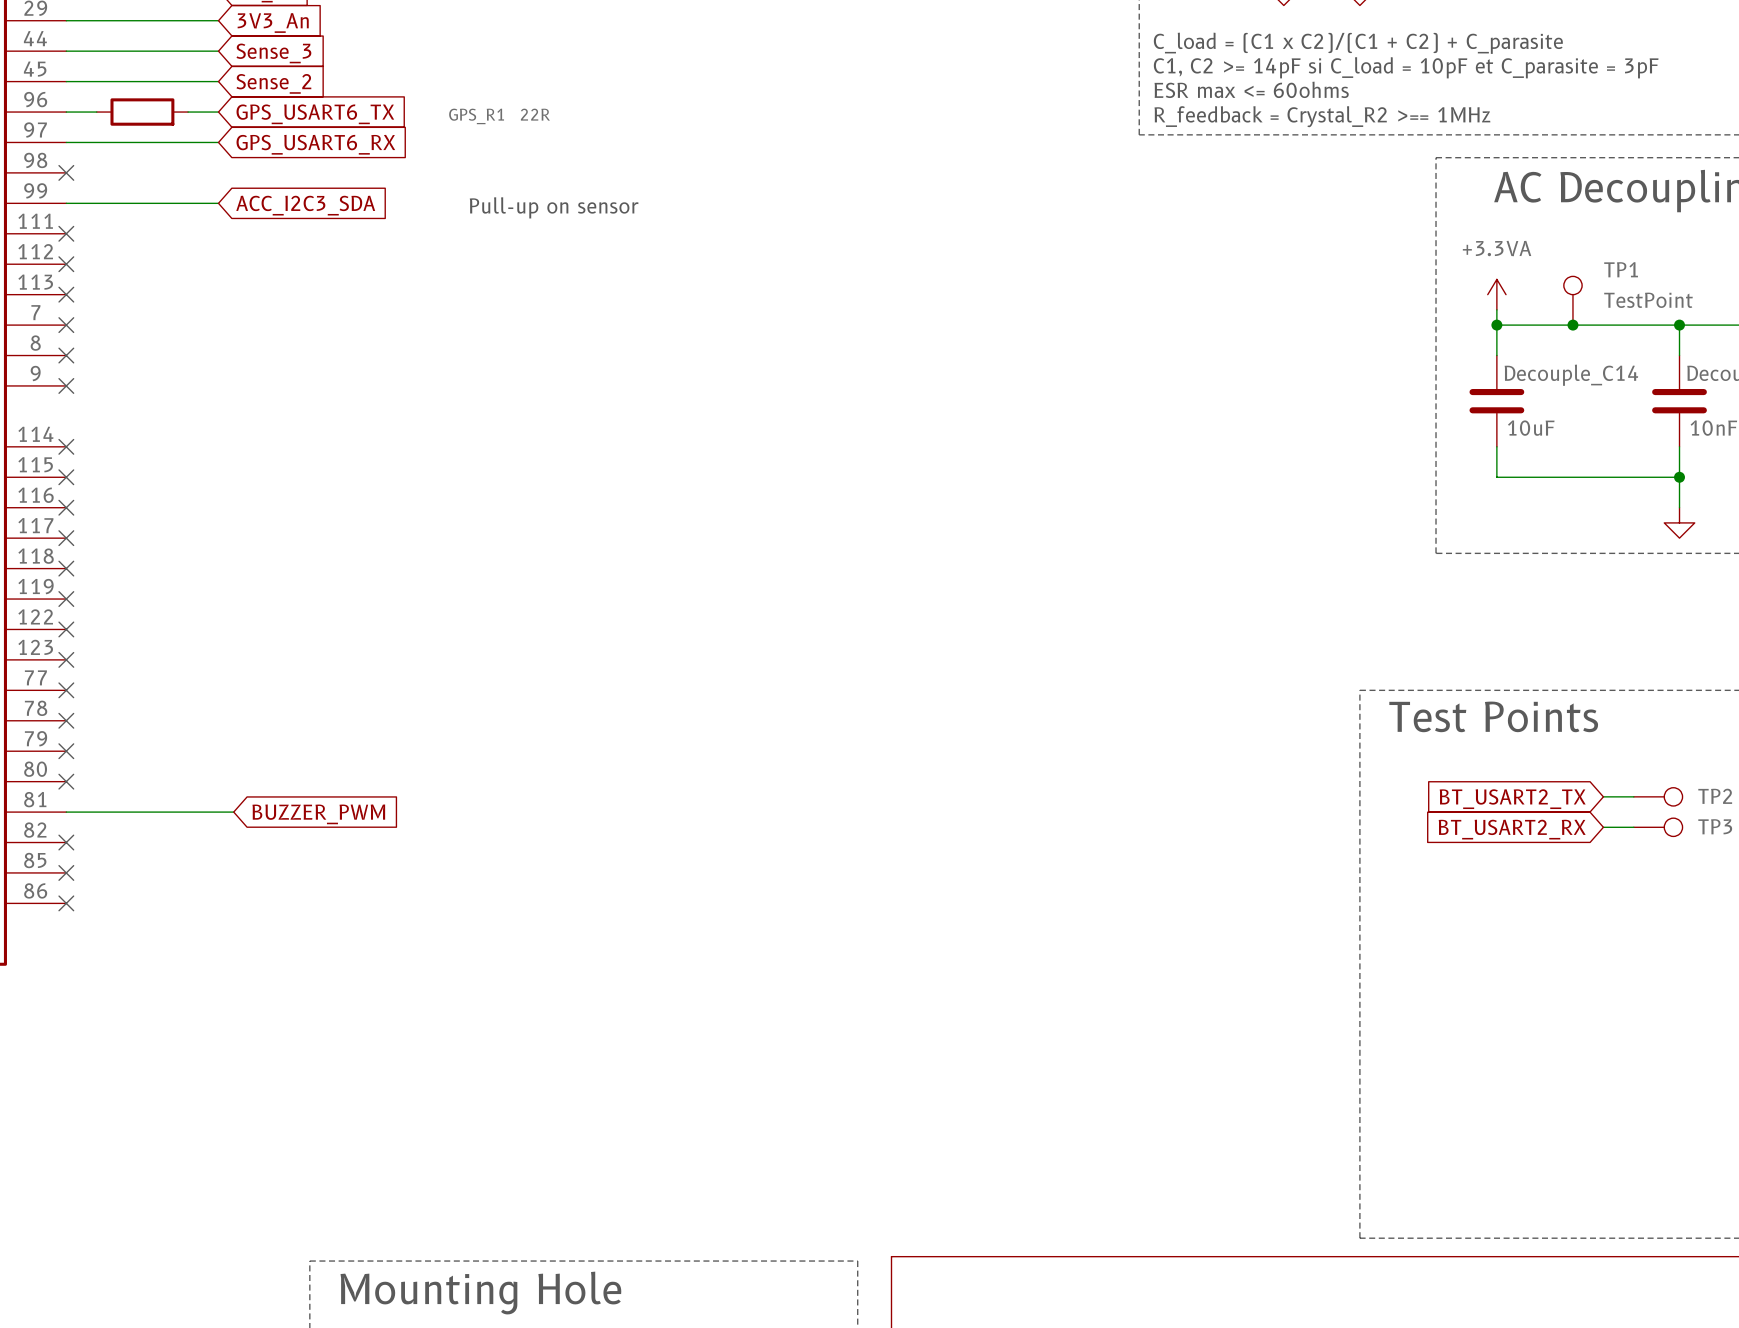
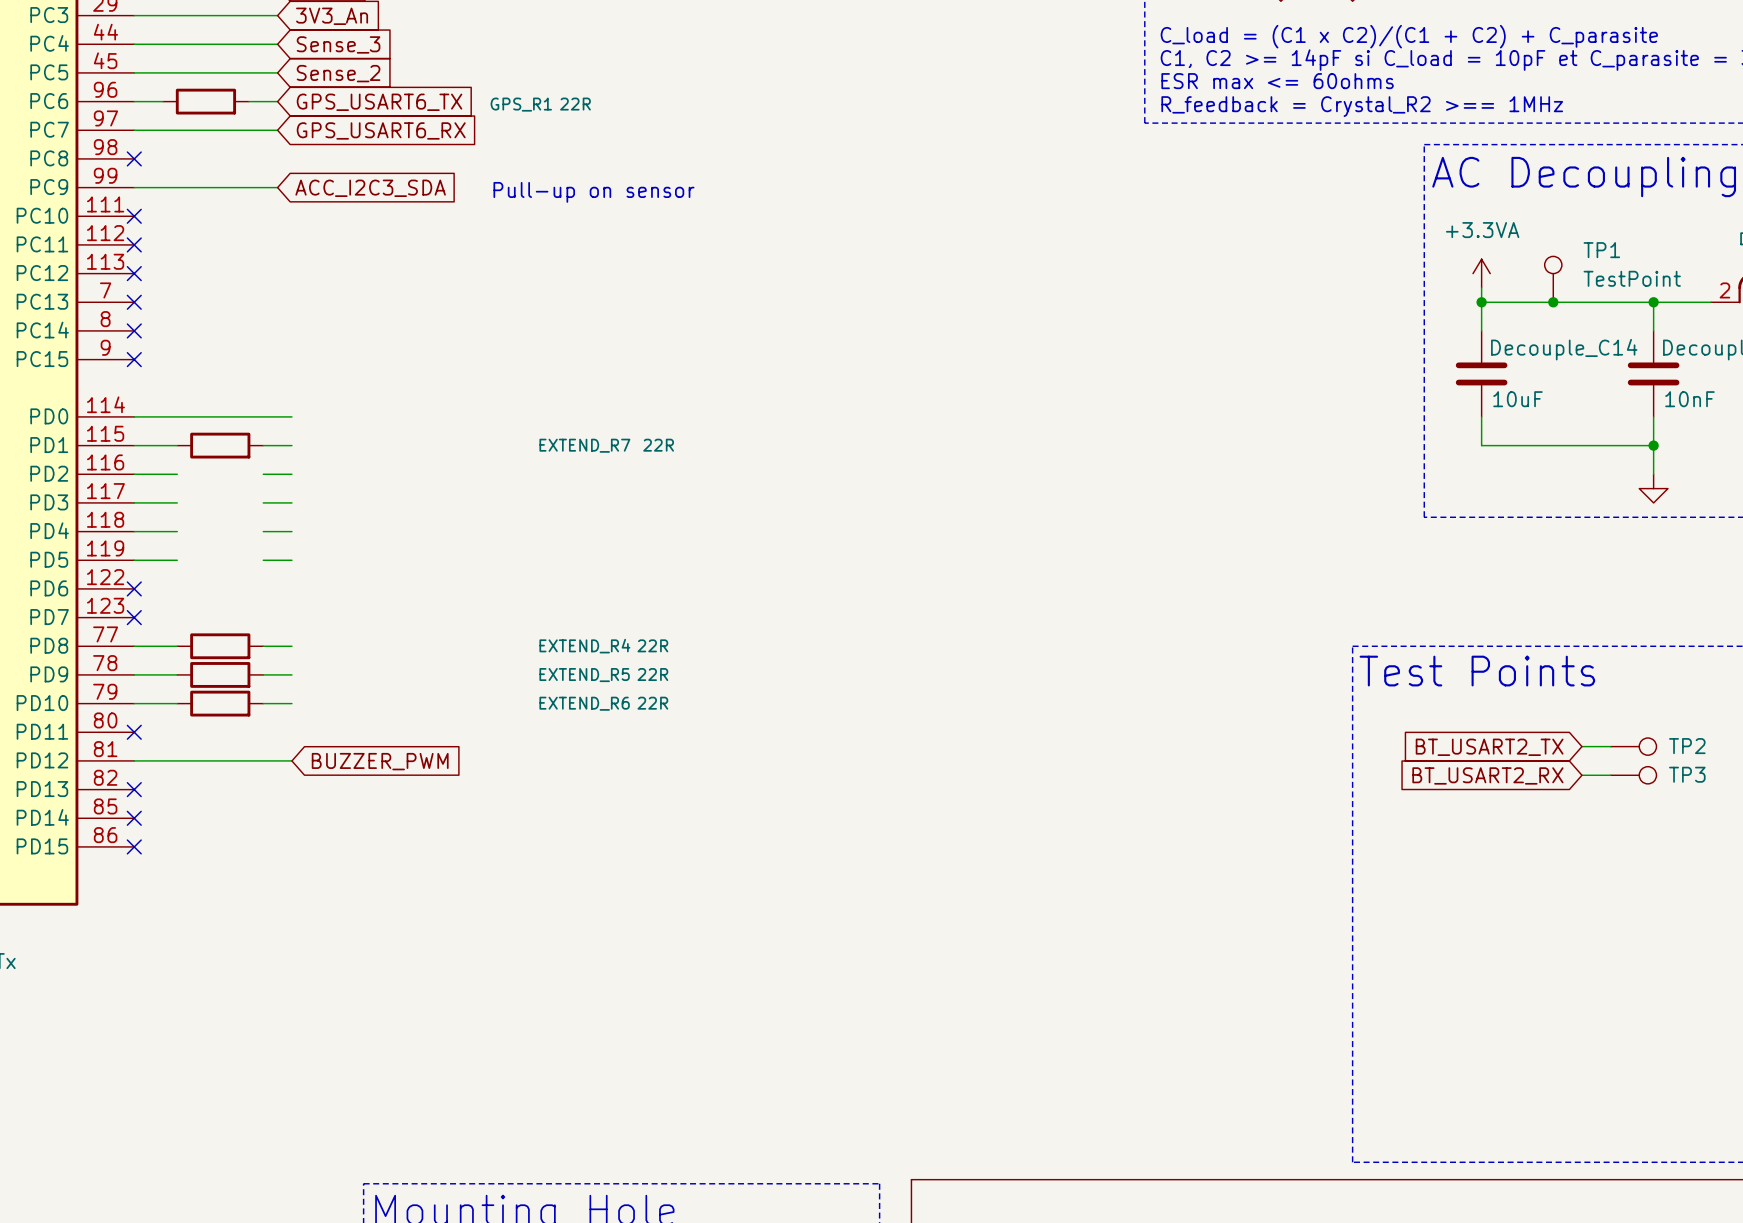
wire: none -> (134, 416) (291, 416)
no-connect mark: (66, 446) -> none
wire: none -> (134, 445) (177, 445)
no-connect mark: (66, 477) -> none
EXTEND_R7: none -> 22R (220, 445)
wire: none -> (263, 445) (291, 445)
wire: none -> (134, 474) (177, 474)
no-connect mark: (66, 507) -> none
wire: none -> (263, 474) (291, 474)
wire: none -> (134, 502) (177, 502)
no-connect mark: (66, 538) -> none
wire: none -> (263, 502) (291, 502)
wire: none -> (134, 531) (177, 531)
no-connect mark: (66, 568) -> none
wire: none -> (263, 531) (291, 531)
wire: none -> (134, 560) (177, 560)
no-connect mark: (66, 599) -> none
wire: none -> (263, 560) (291, 560)
wire: none -> (134, 646) (177, 646)
no-connect mark: (66, 690) -> none
EXTEND_R4: none -> 22R (220, 646)
wire: none -> (263, 646) (291, 646)
wire: none -> (134, 674) (177, 674)
no-connect mark: (66, 720) -> none
EXTEND_R5: none -> 22R (220, 674)
wire: none -> (263, 674) (291, 674)
wire: none -> (134, 703) (177, 703)
no-connect mark: (66, 751) -> none
EXTEND_R6: none -> 22R (220, 703)
wire: none -> (263, 703) (291, 703)

